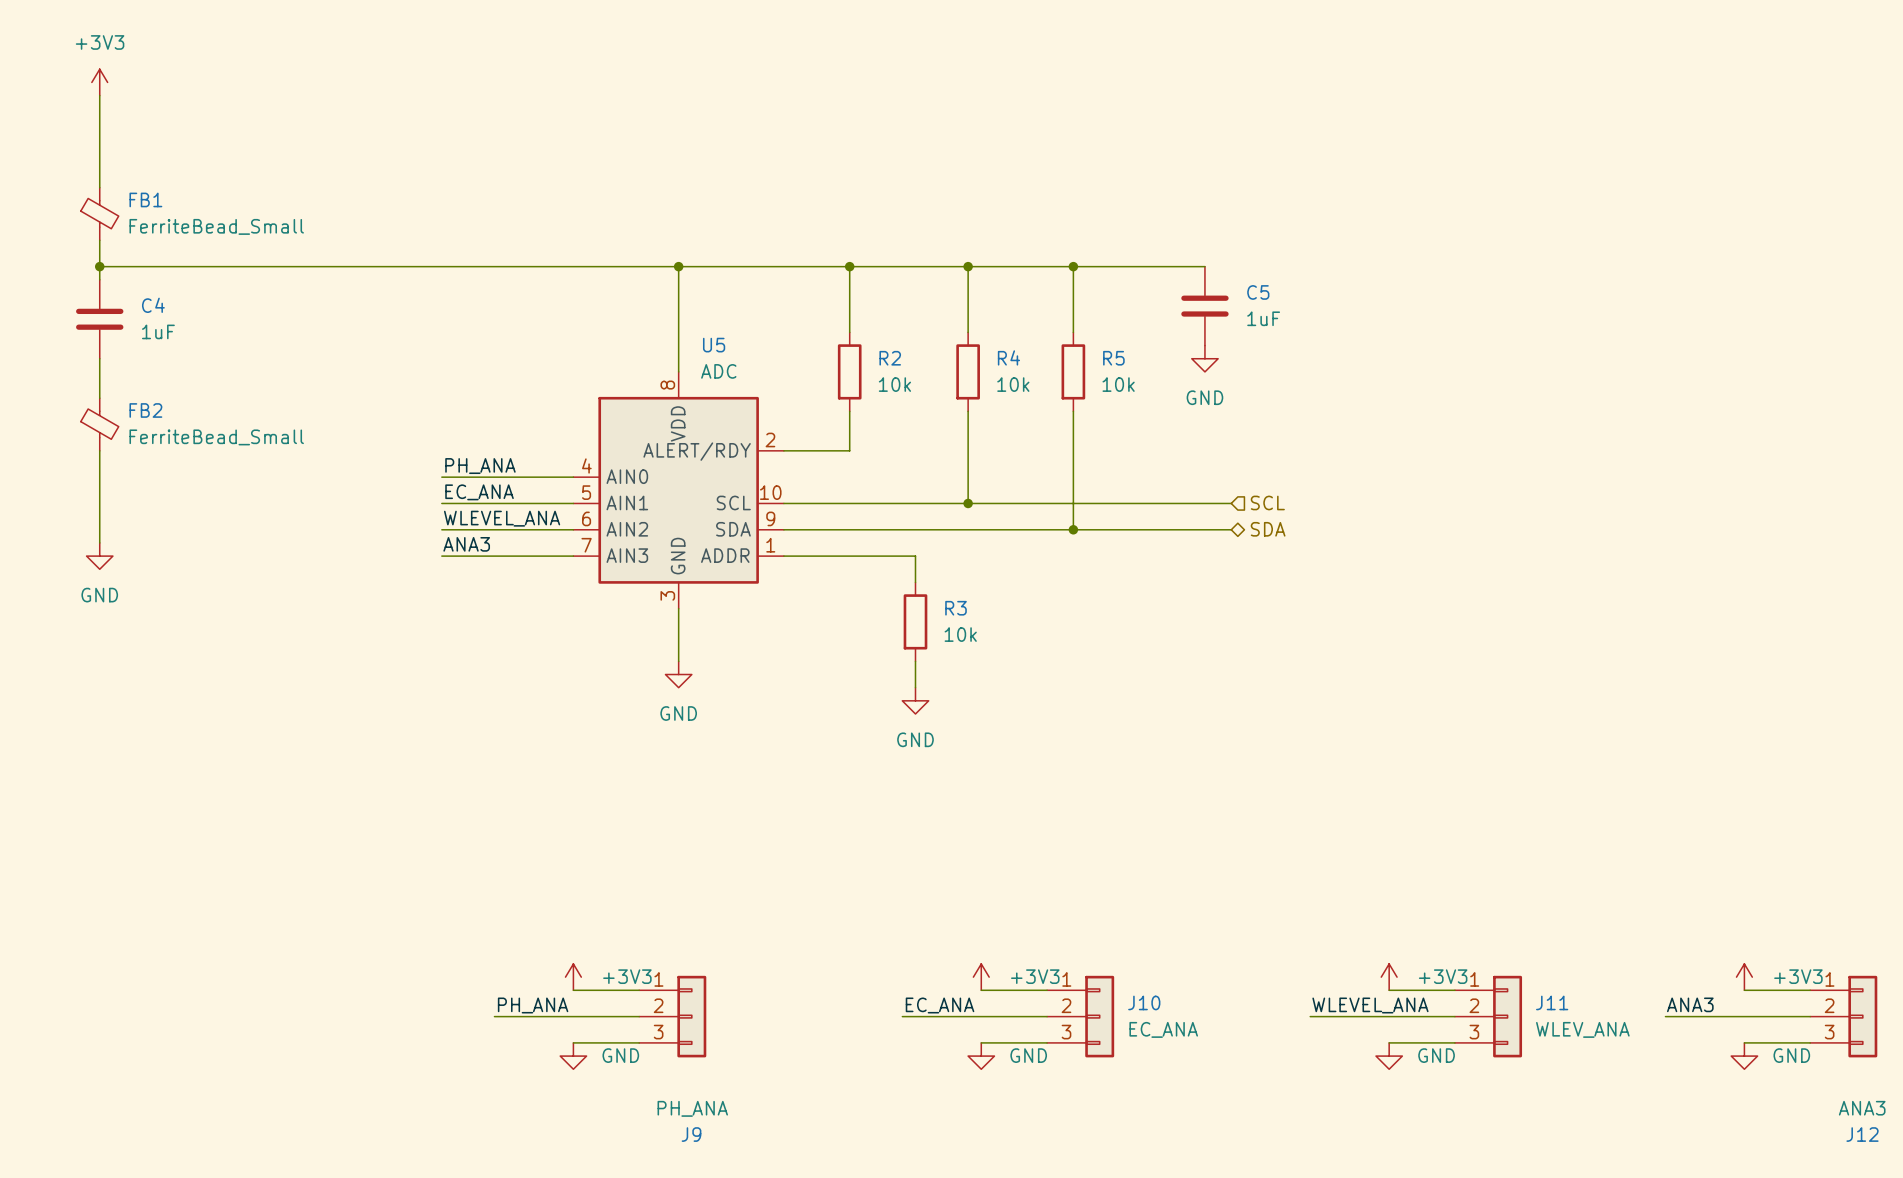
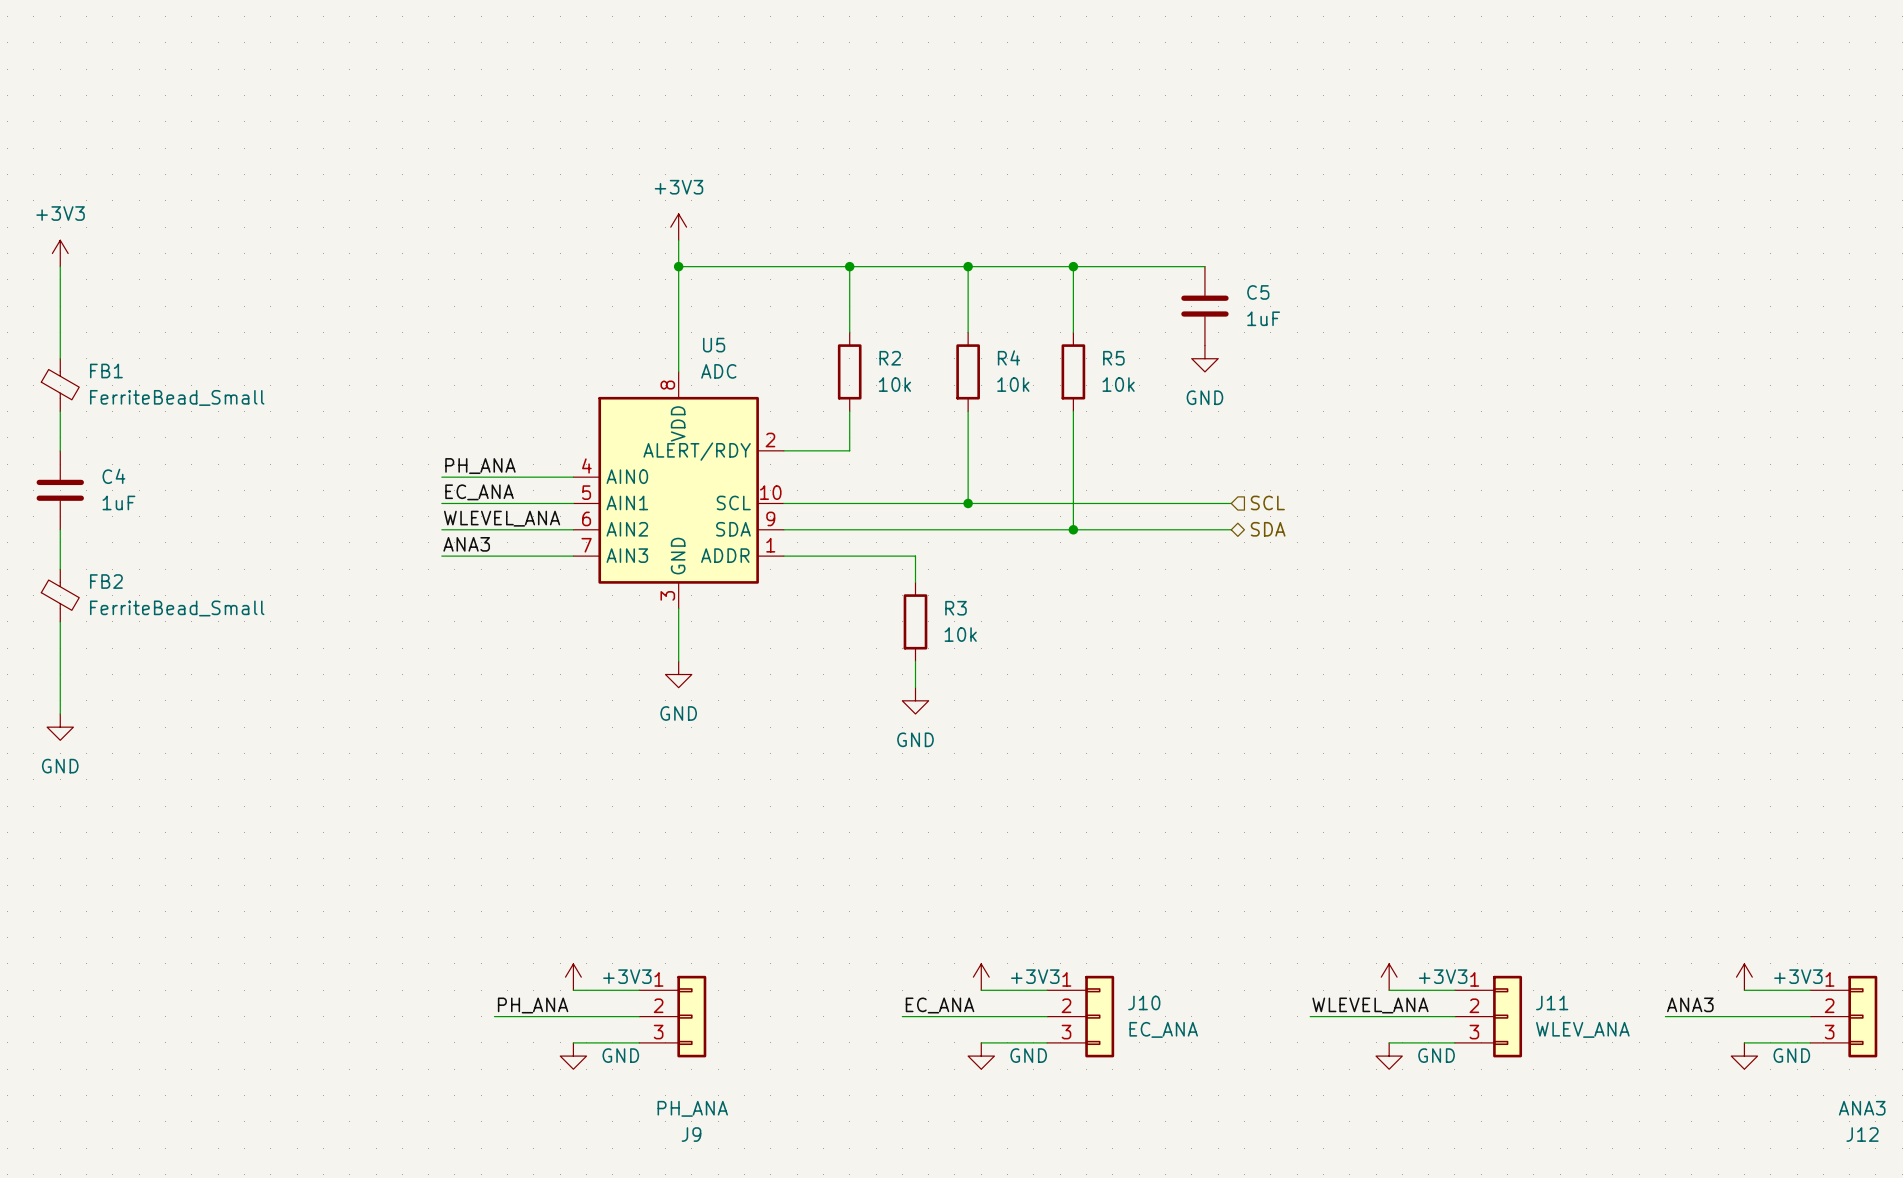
power symbol position: +3V3 (99, 82) -> +3V3 (60, 253)
wire: (99, 95) (99, 187) -> (60, 266) (60, 358)
FB1 position: (99, 214) -> (60, 385)
power symbol: none -> +3V3 (678, 227)
wire: (99, 240) (99, 279) -> (60, 411) (60, 450)
wire: (99, 266) (678, 266) -> (678, 240) (678, 266)
junction: (99, 266) -> none
C4 position: (99, 319) -> (60, 490)
wire: (99, 358) (99, 398) -> (60, 529) (60, 569)
FB2 position: (99, 424) -> (60, 595)
wire: (99, 450) (99, 542) -> (60, 621) (60, 713)
power symbol position: GND (99, 556) -> GND (60, 727)

